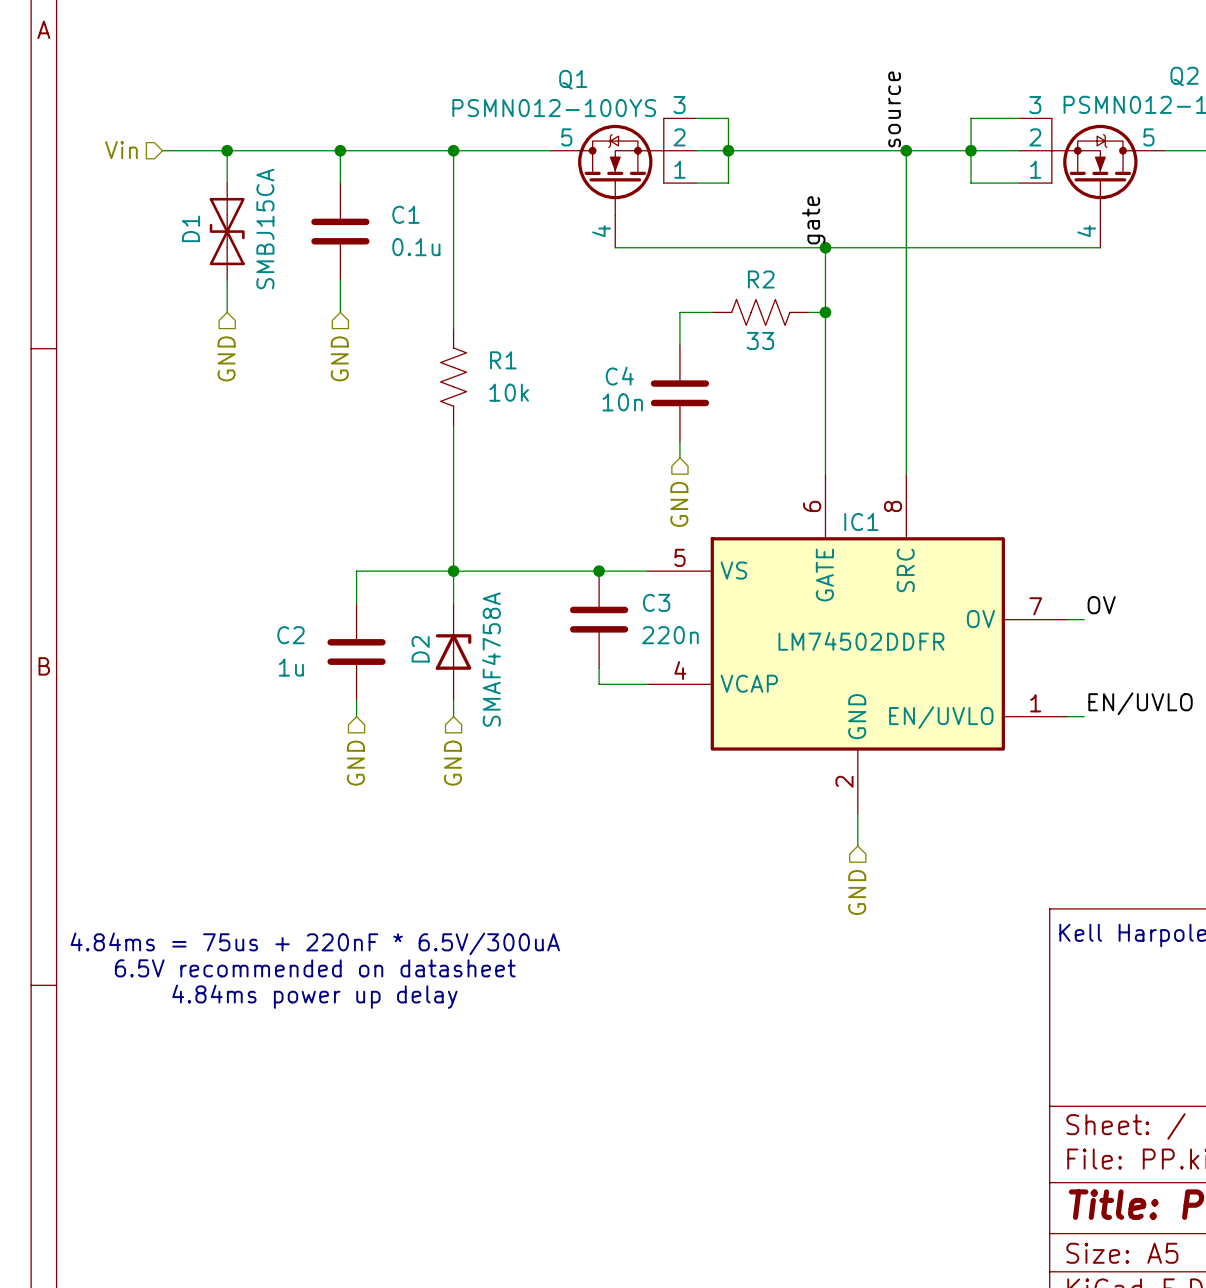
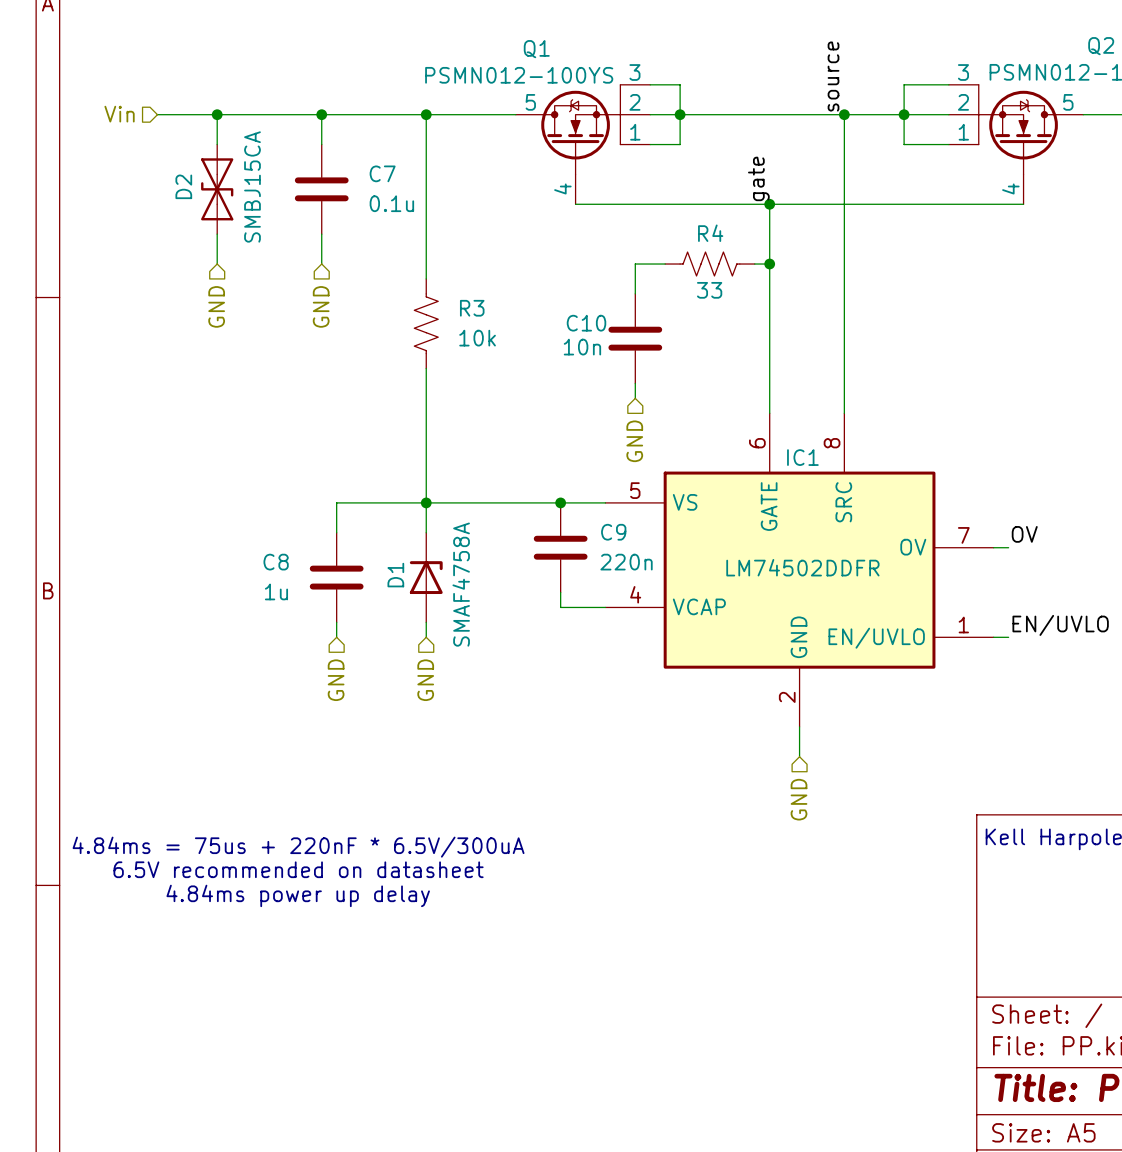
C1 name: C1 (405, 214) -> C7 (382, 173)
D1 name: D1 (191, 228) -> D2 (183, 186)
R2 name: R2 (761, 279) -> R4 (710, 233)
R1 name: R1 (503, 360) -> R3 (472, 308)
C4 name: C4 (619, 376) -> C10 (586, 323)
C3 name: C3 (656, 602) -> C9 (613, 532)
C2 name: C2 (290, 635) -> C8 (276, 562)
D2 name: D2 (420, 649) -> D1 (395, 575)

